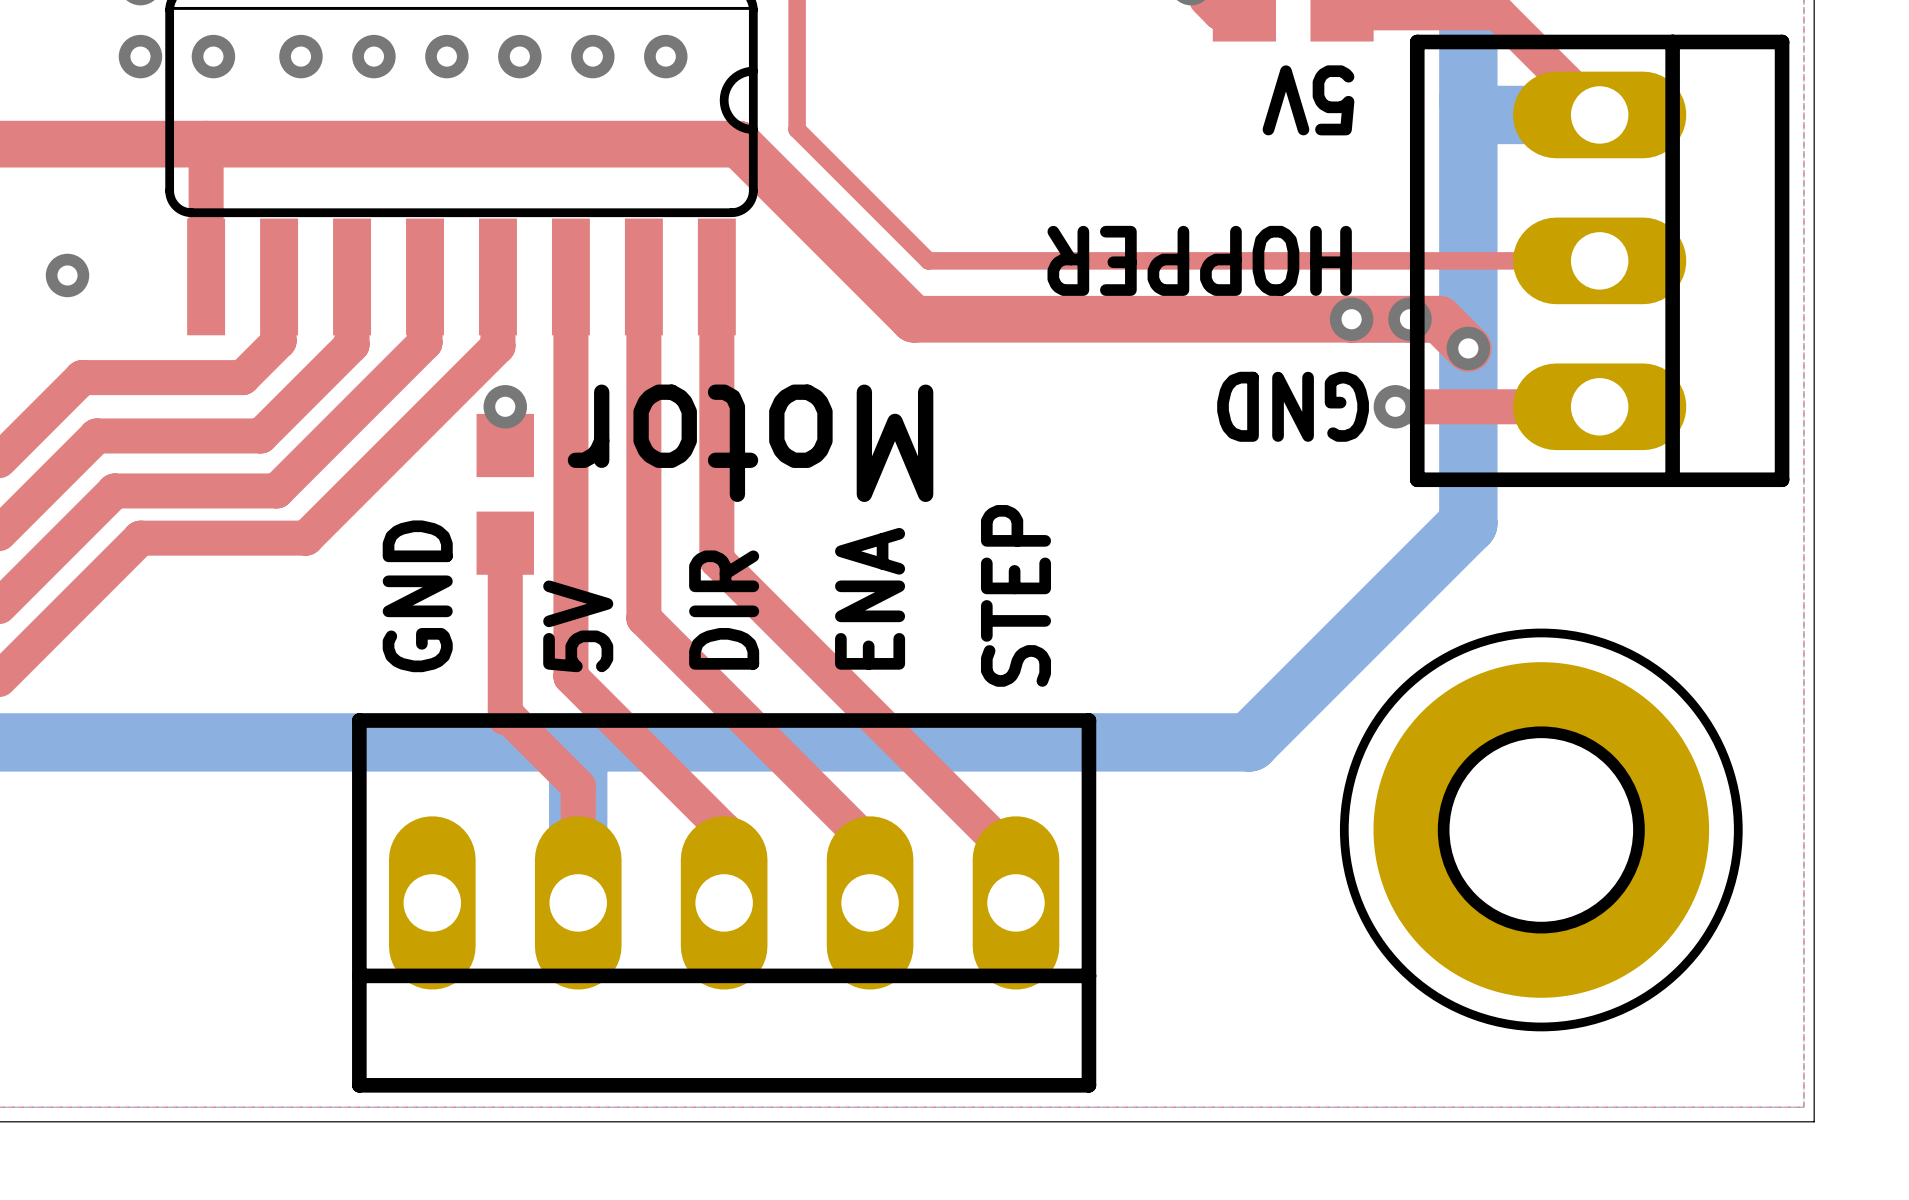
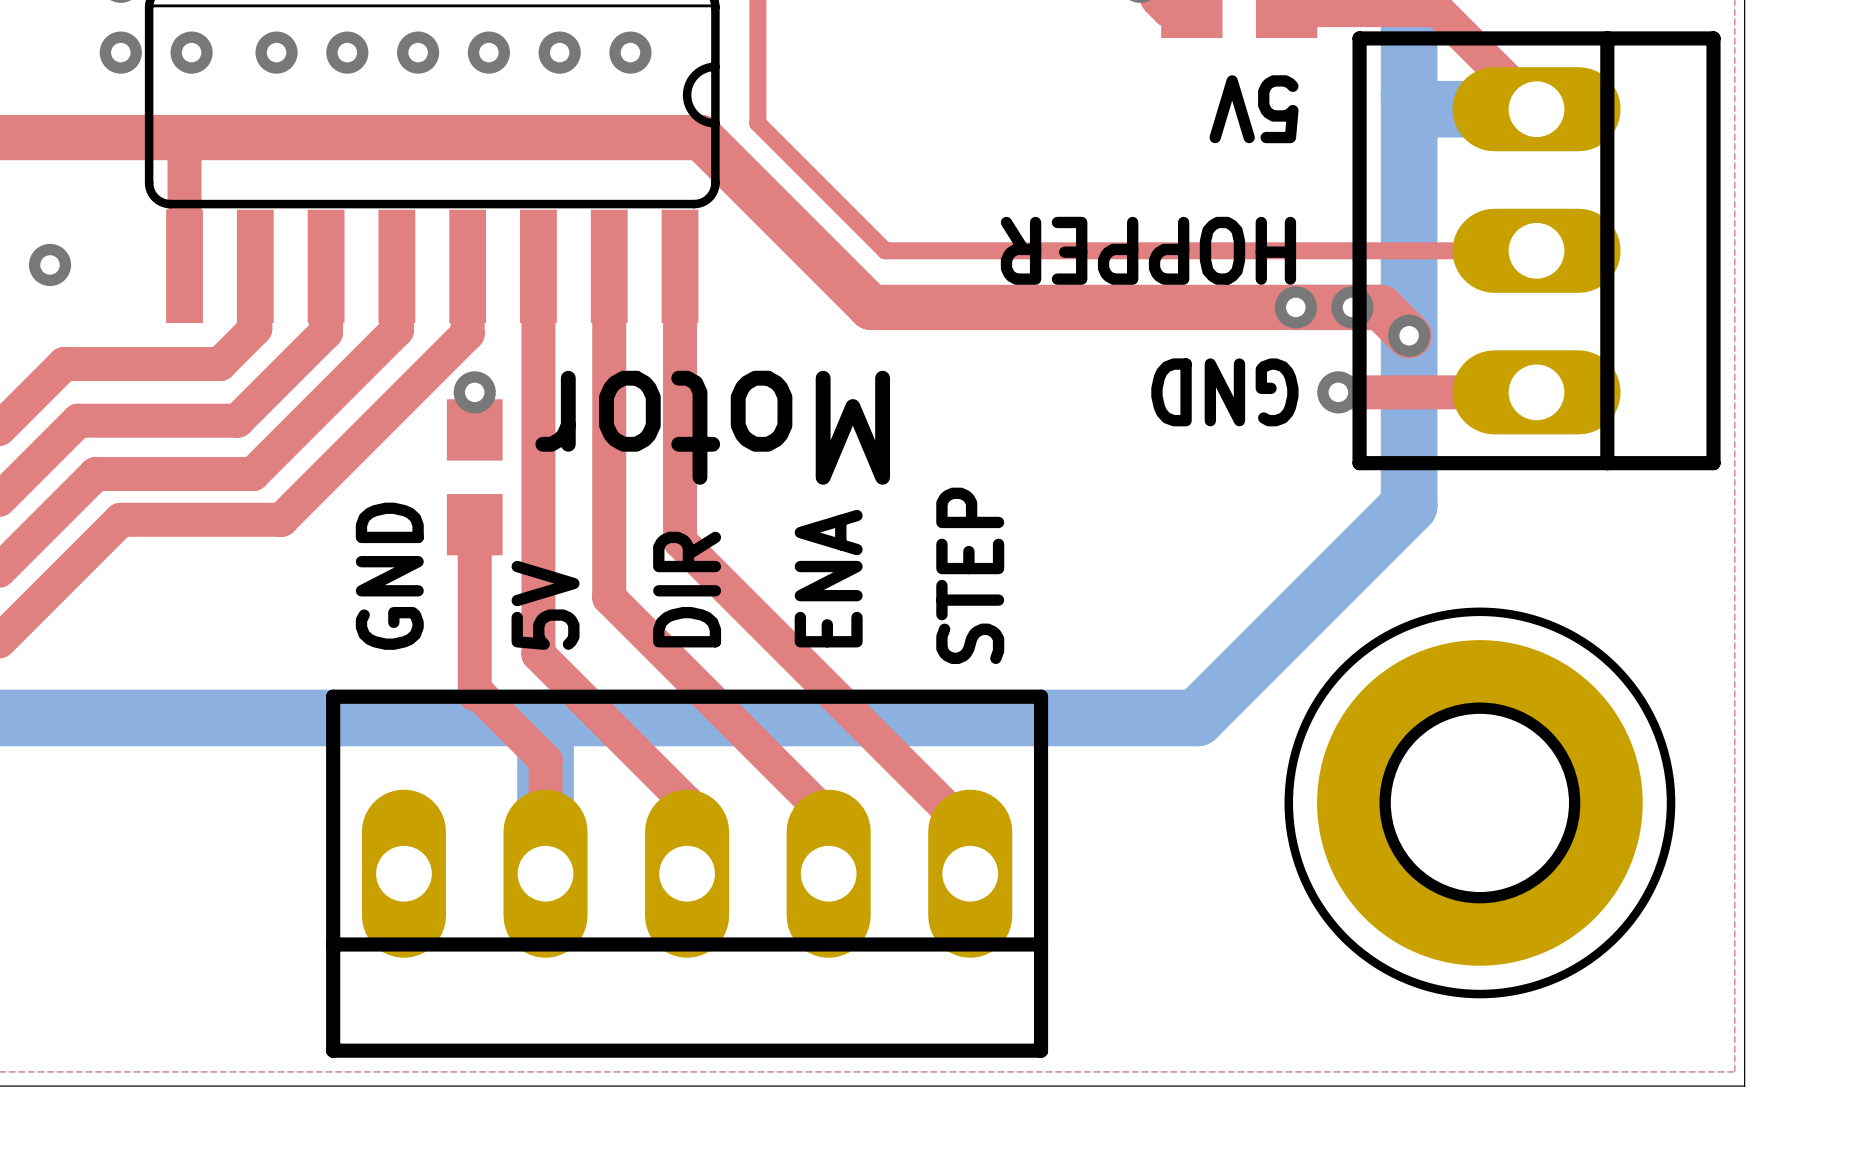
text position: 5V (1308, 100) -> 5V (1254, 109)
text position: GND (1293, 406) -> GND (1224, 392)

